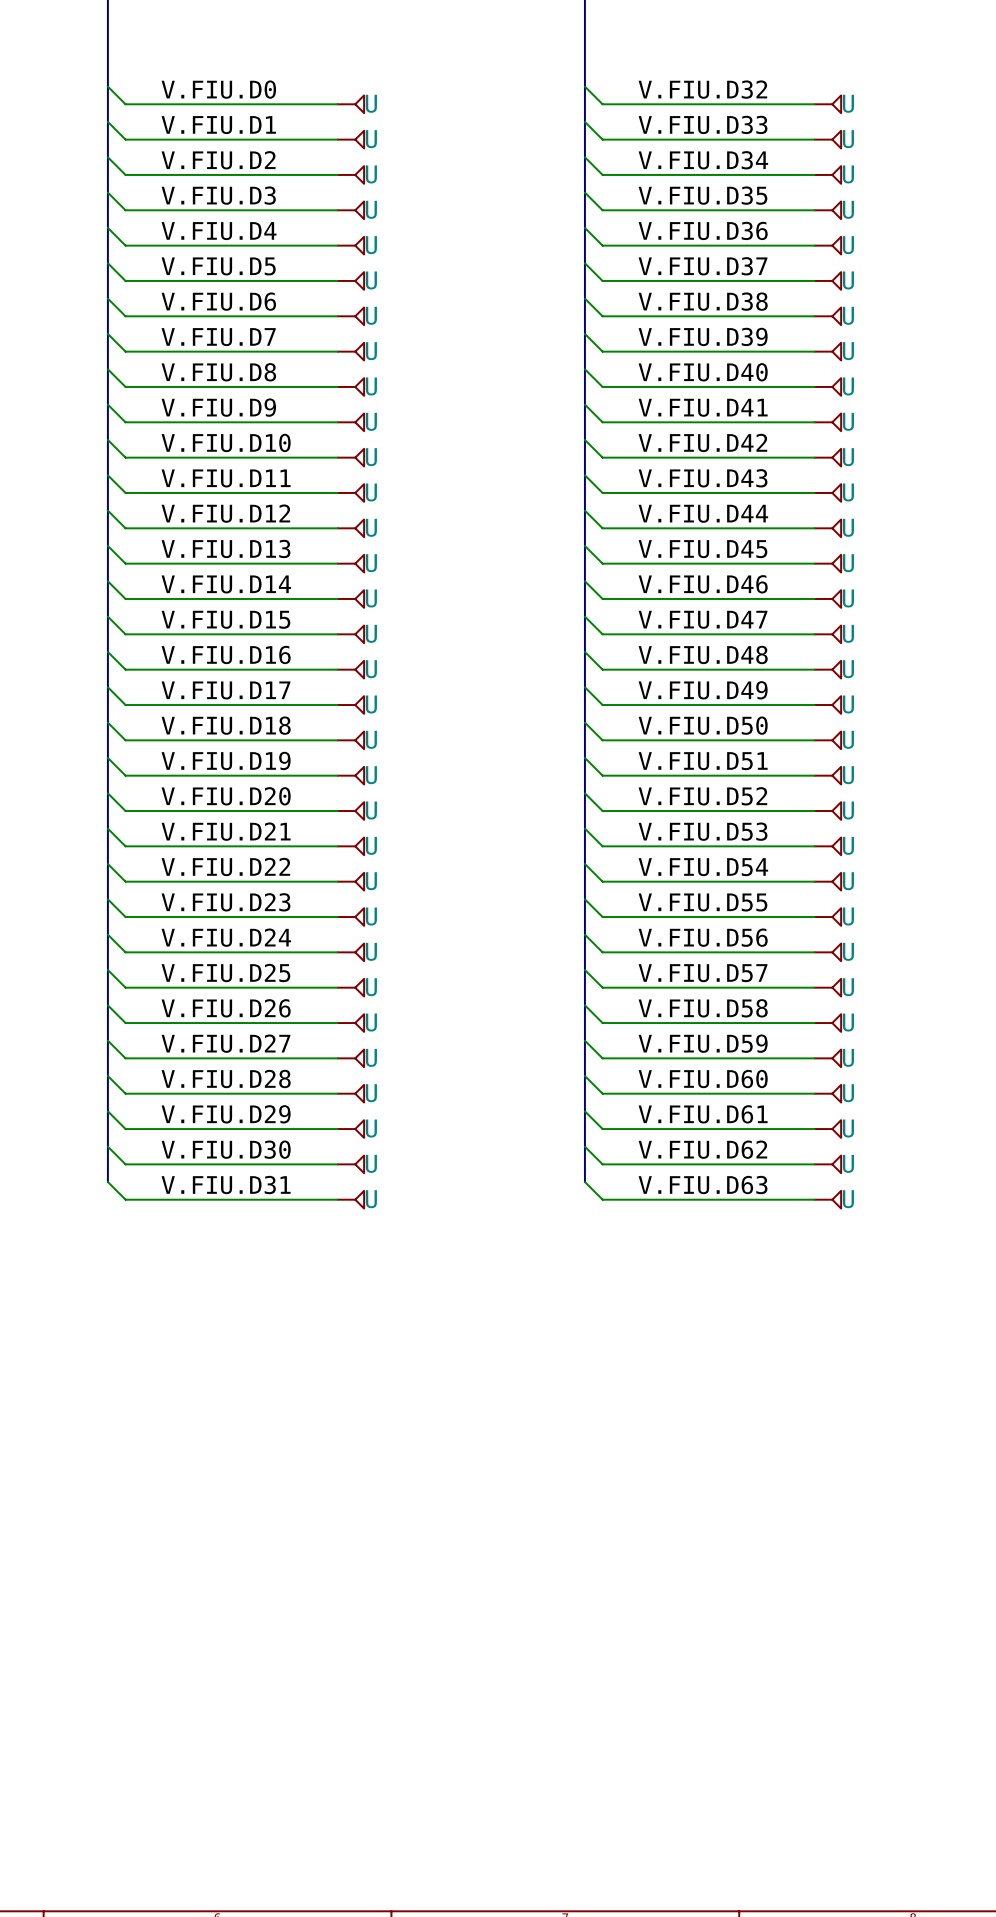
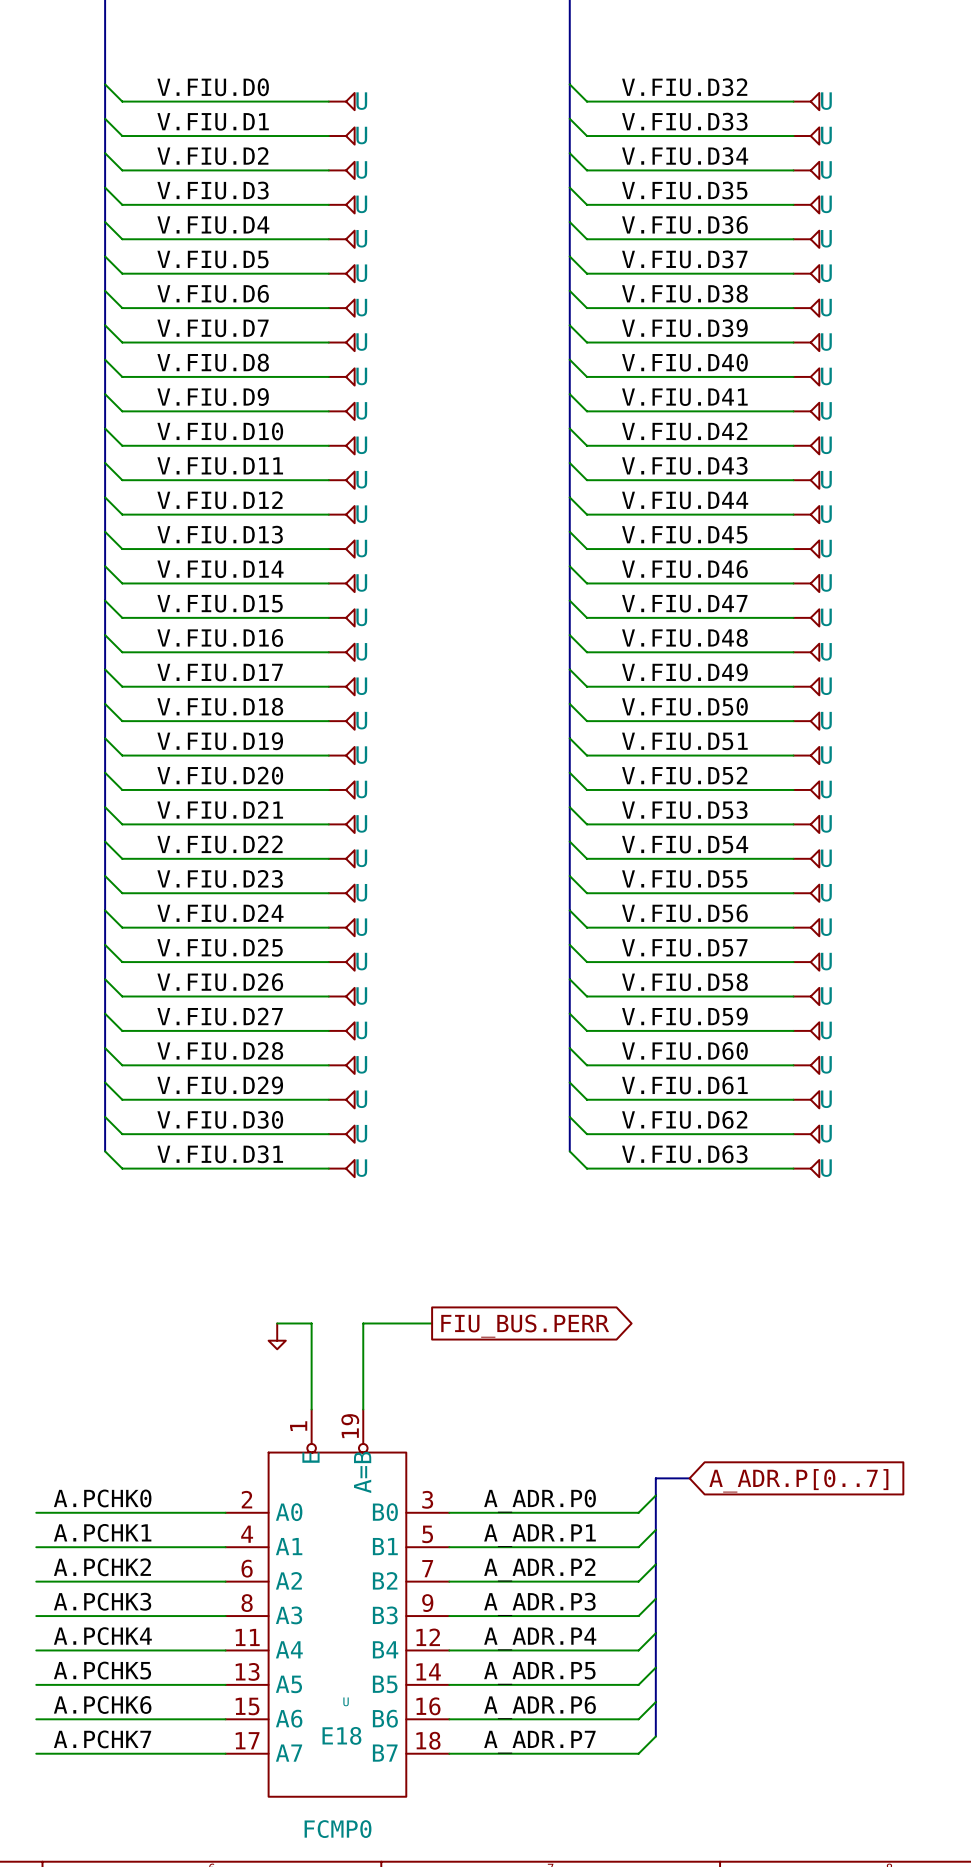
wire: none -> (277, 1323) (311, 1323) (311, 1409)
wire: none -> (432, 1323) (363, 1323) (363, 1409)
global label: none -> FIU_BUS.PERR (525, 1326)
power symbol: none -> (277, 1336)
bus: none -> (690, 1478) (655, 1478) (655, 1736)
global label: none -> A_ADR.P[0..7] (798, 1480)
wire: none -> (655, 1495) (638, 1512) (449, 1512)
label: none -> A.PCHK0 (102, 1498)
label: none -> A_ADR.P0 (540, 1501)
wire: none -> (36, 1512) (225, 1512)
wire: none -> (655, 1530) (638, 1547) (449, 1547)
label: none -> A.PCHK1 (102, 1532)
label: none -> A_ADR.P1 (539, 1535)
wire: none -> (36, 1547) (225, 1547)
wire: none -> (655, 1564) (638, 1581) (449, 1581)
label: none -> A.PCHK2 (102, 1567)
label: none -> A_ADR.P2 (539, 1569)
wire: none -> (36, 1581) (225, 1581)
wire: none -> (655, 1598) (638, 1616) (449, 1616)
label: none -> A.PCHK3 (102, 1601)
U: none -> (337, 1603)
label: none -> A_ADR.P3 (539, 1604)
wire: none -> (36, 1616) (225, 1616)
wire: none -> (655, 1633) (638, 1650) (449, 1650)
label: none -> A.PCHK4 (102, 1636)
label: none -> A_ADR.P4 (540, 1638)
wire: none -> (36, 1650) (225, 1650)
wire: none -> (655, 1667) (638, 1684) (449, 1684)
label: none -> A.PCHK5 (102, 1670)
label: none -> A_ADR.P5 (539, 1673)
wire: none -> (36, 1684) (225, 1684)
wire: none -> (655, 1702) (638, 1719) (449, 1719)
label: none -> A.PCHK6 (102, 1704)
label: none -> A_ADR.P6 (540, 1707)
wire: none -> (36, 1719) (225, 1719)
wire: none -> (655, 1736) (638, 1753) (449, 1753)
label: none -> A.PCHK7 (102, 1739)
label: none -> A_ADR.P7 (539, 1742)
wire: none -> (36, 1753) (225, 1753)

